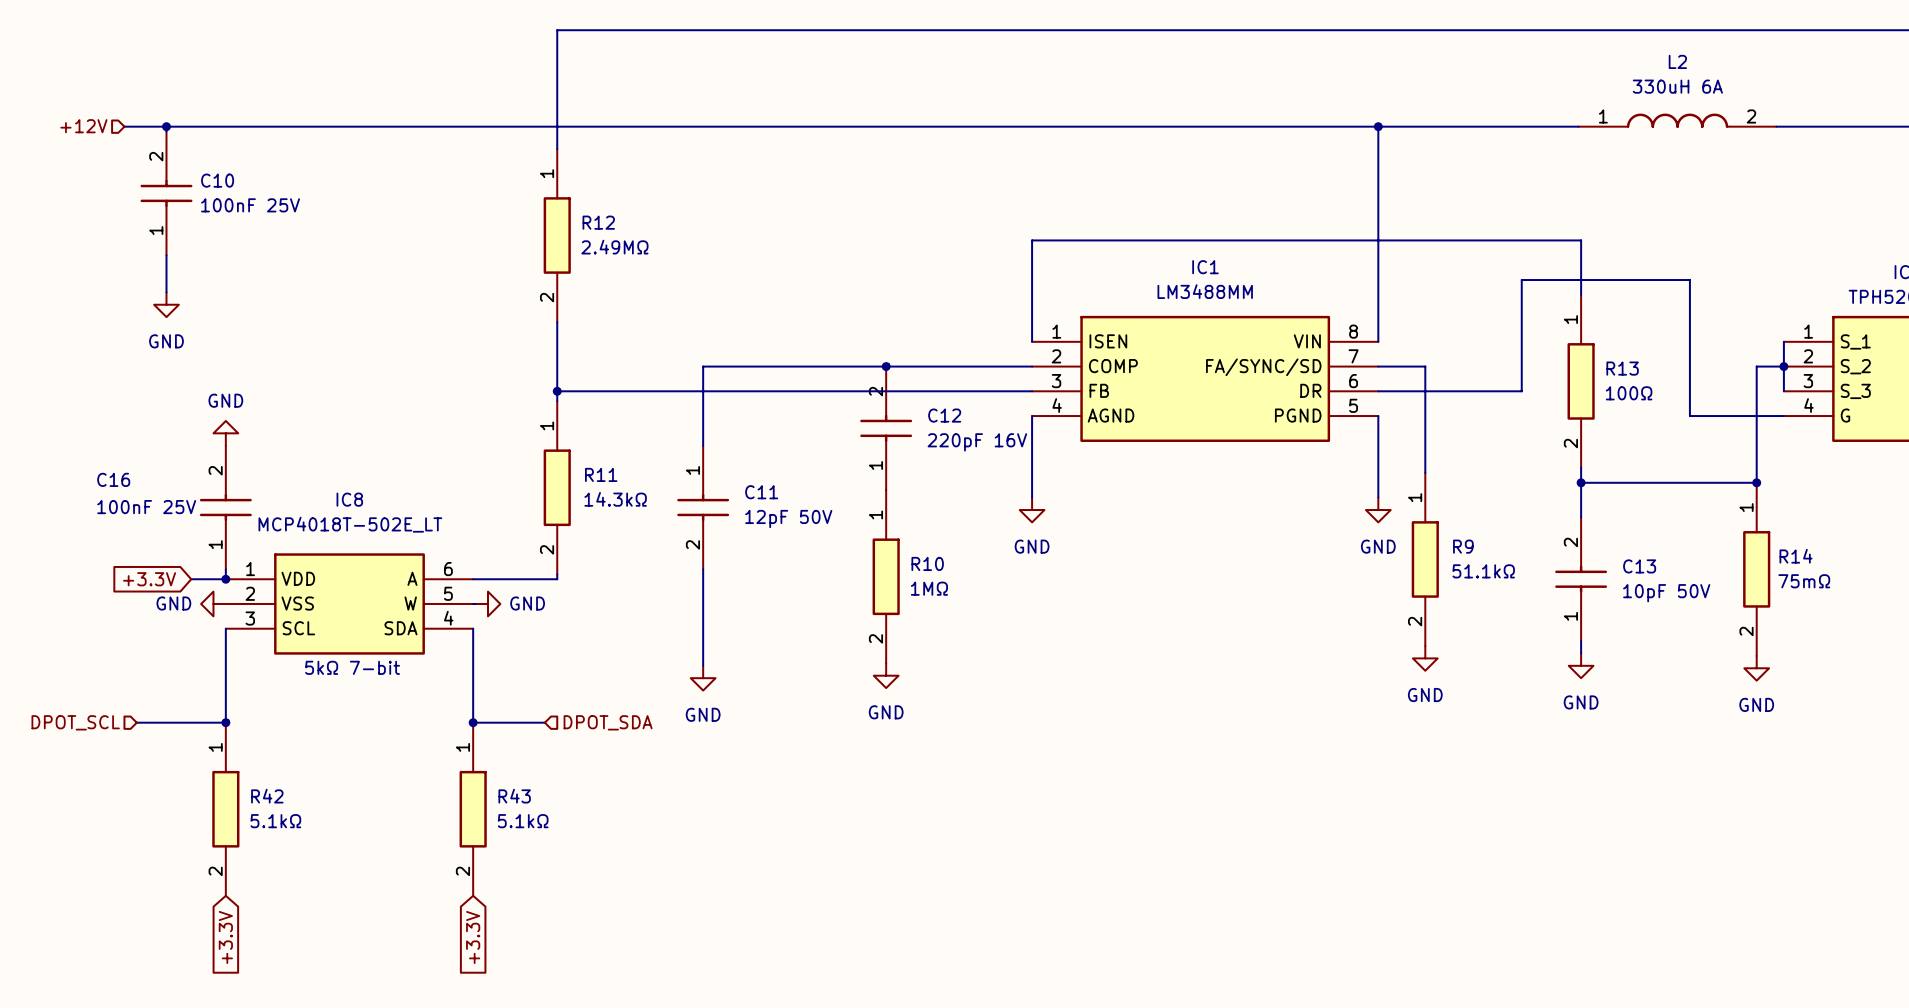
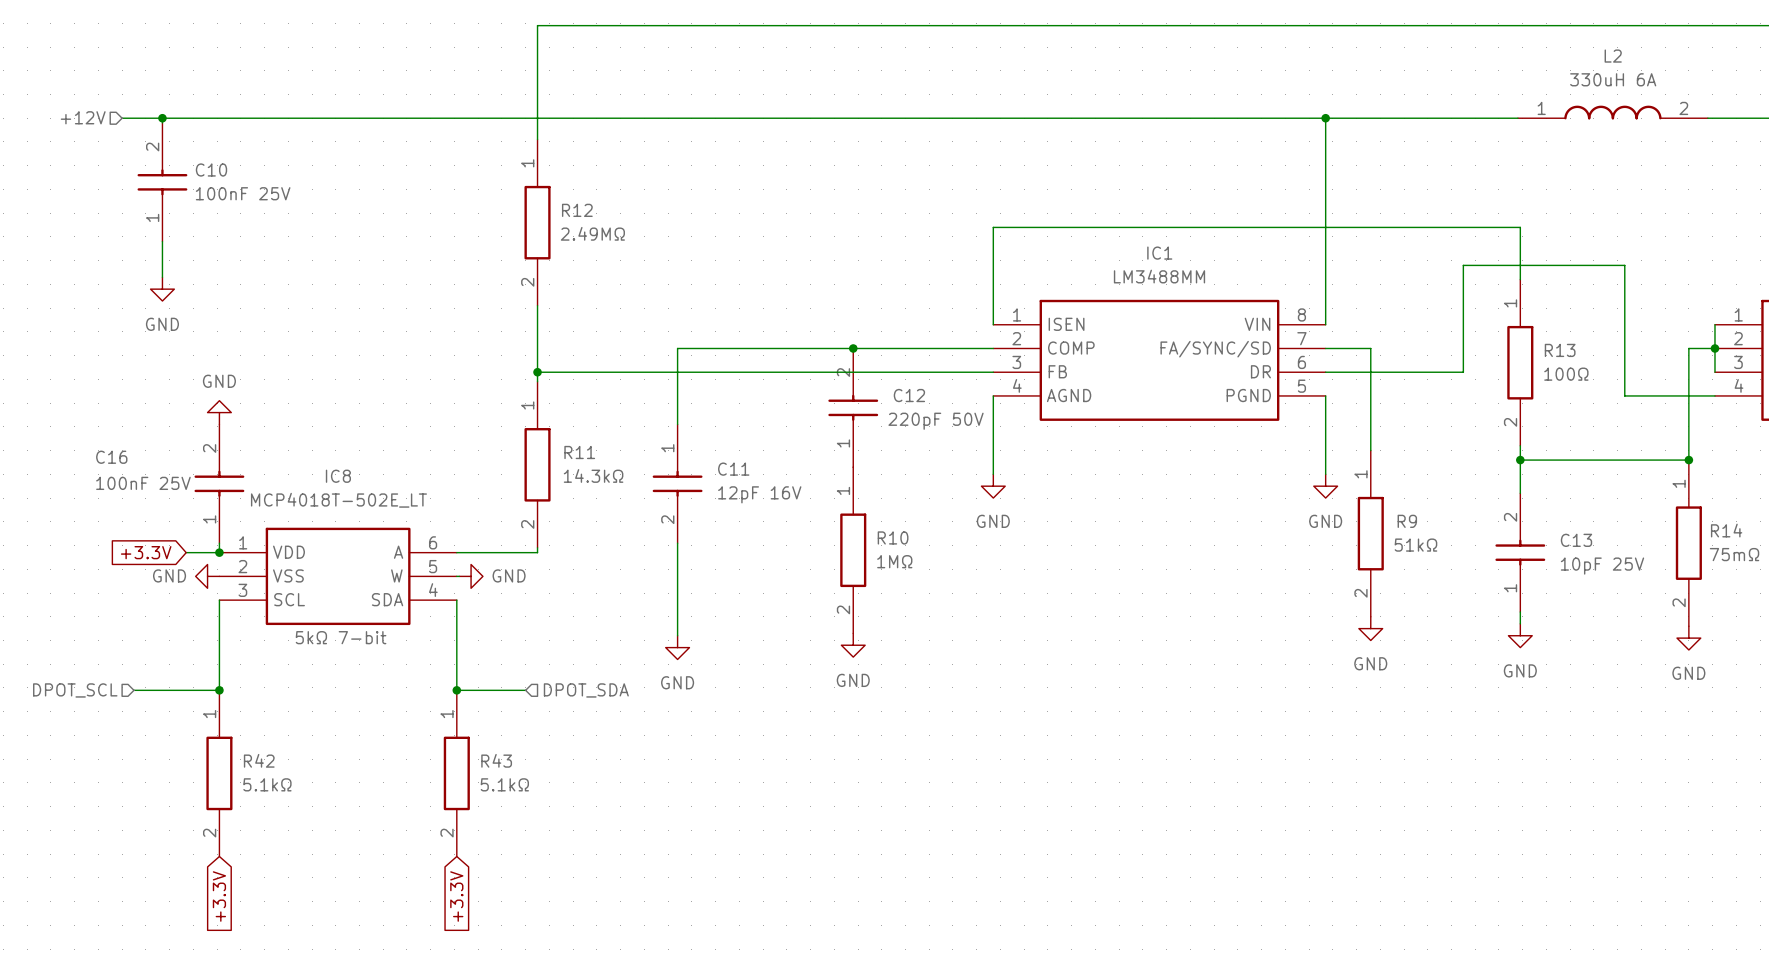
C12 value: 220pF 16V (977, 442) -> 220pF 50V (936, 421)
C11 value: 12pF 50V (788, 519) -> 12pF 16V (759, 494)
R9 value: 51.1kΩ (1483, 571) -> 51kΩ (1415, 545)
C13 value: 10pF 50V (1666, 593) -> 10pF 25V (1602, 566)

